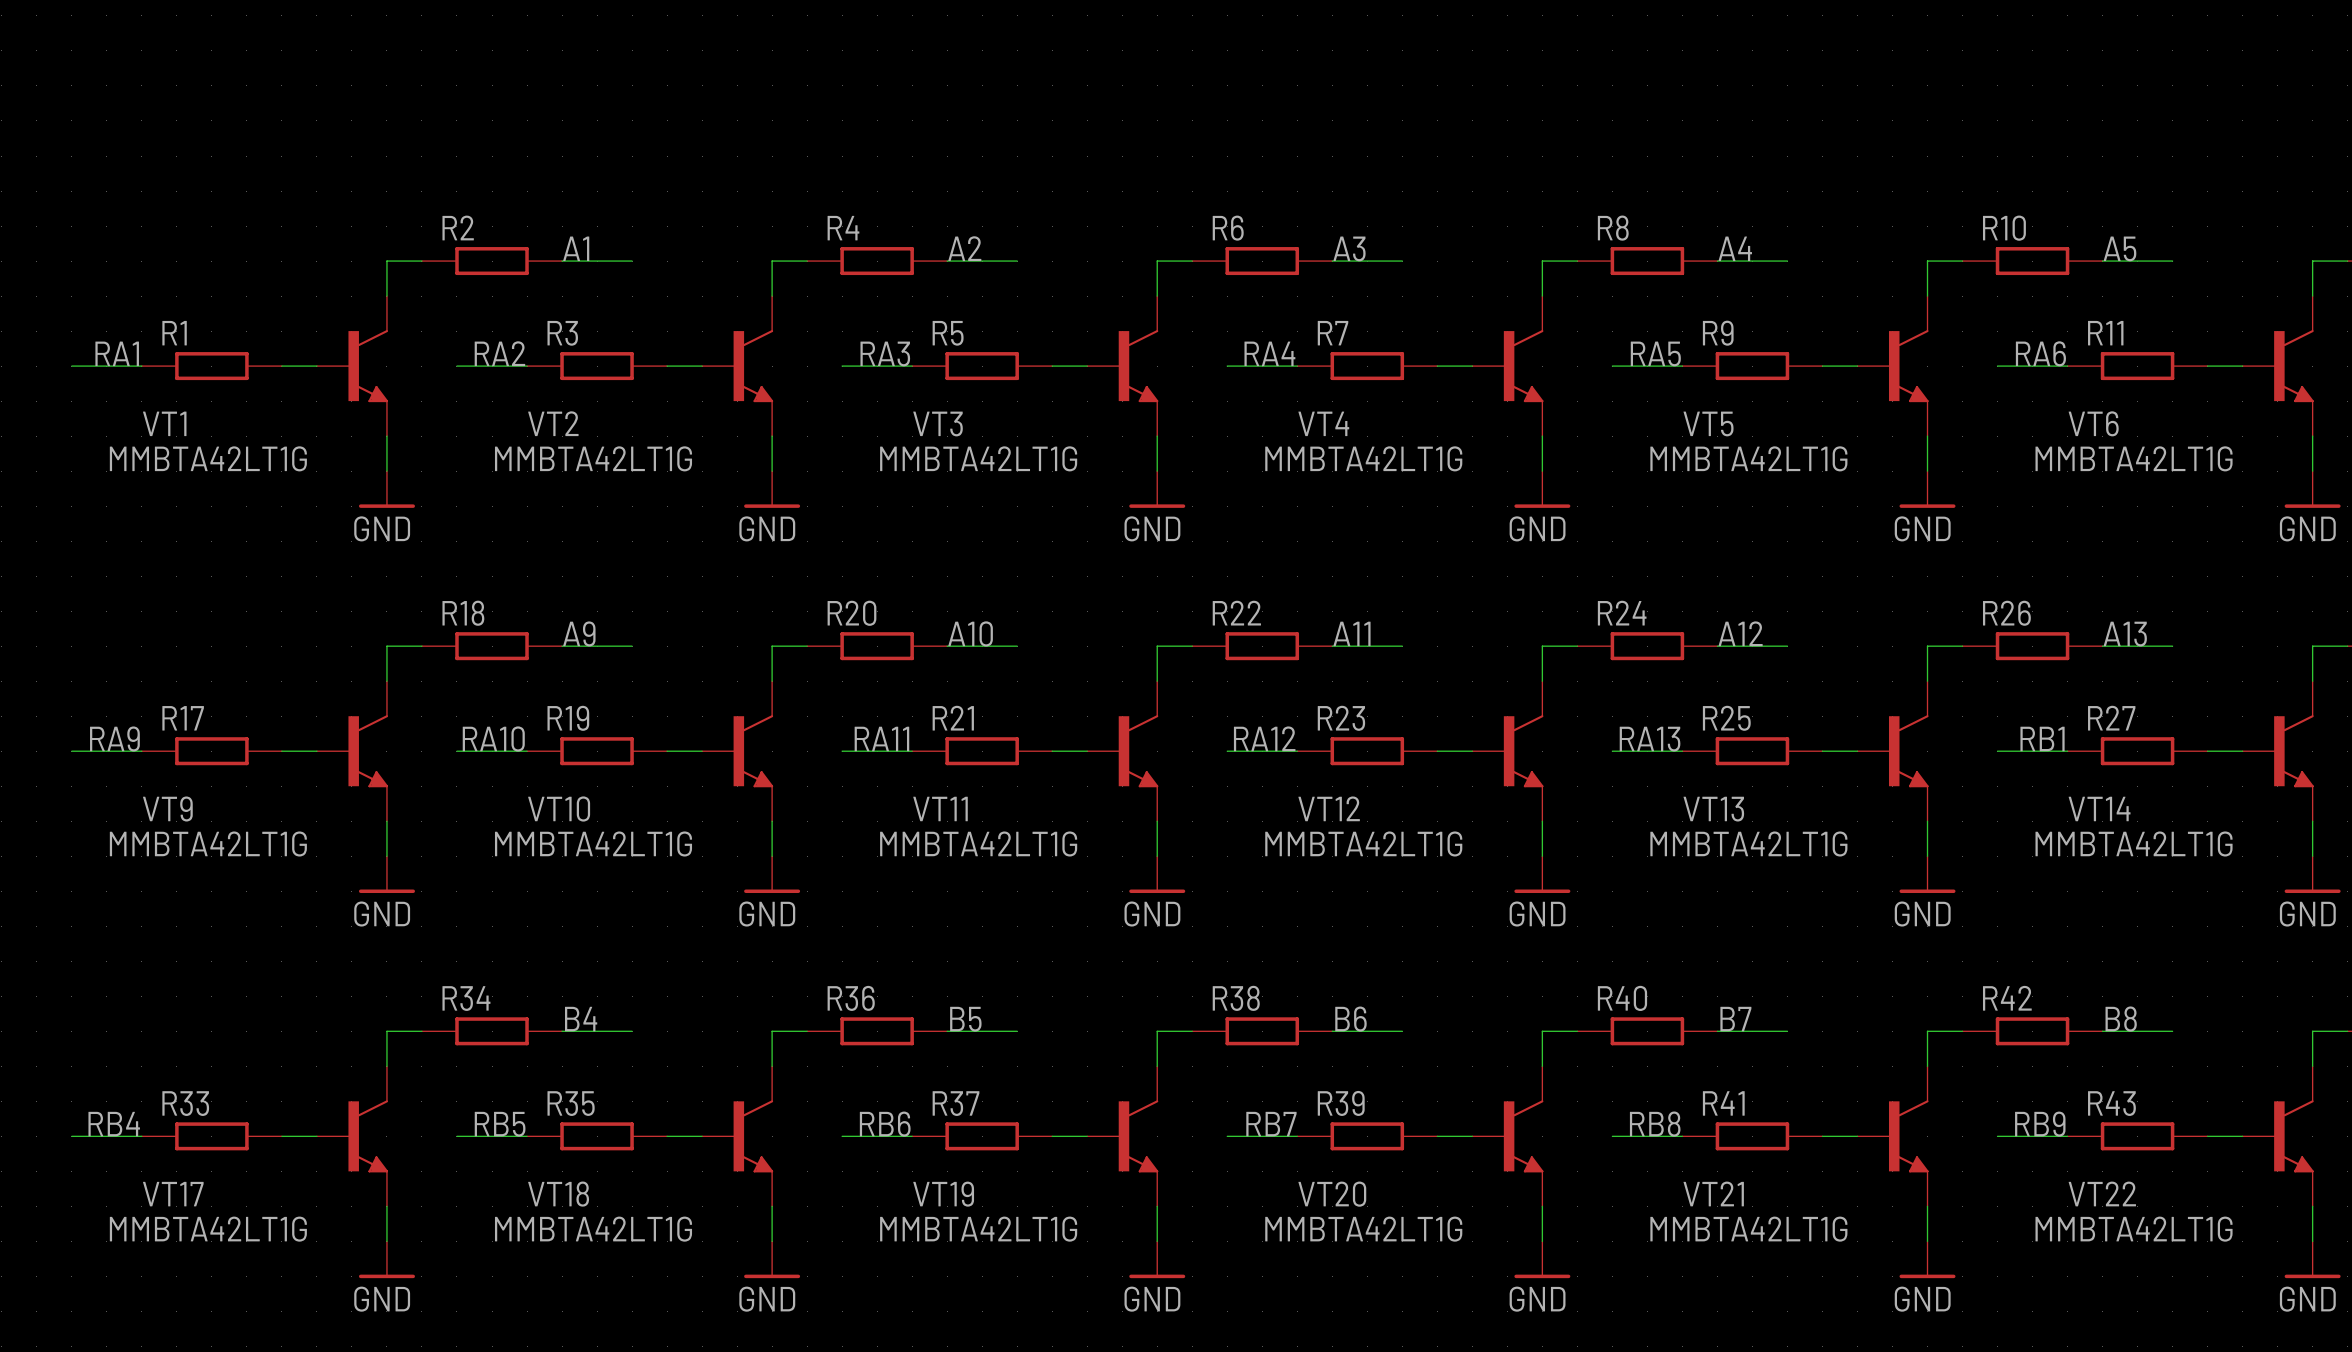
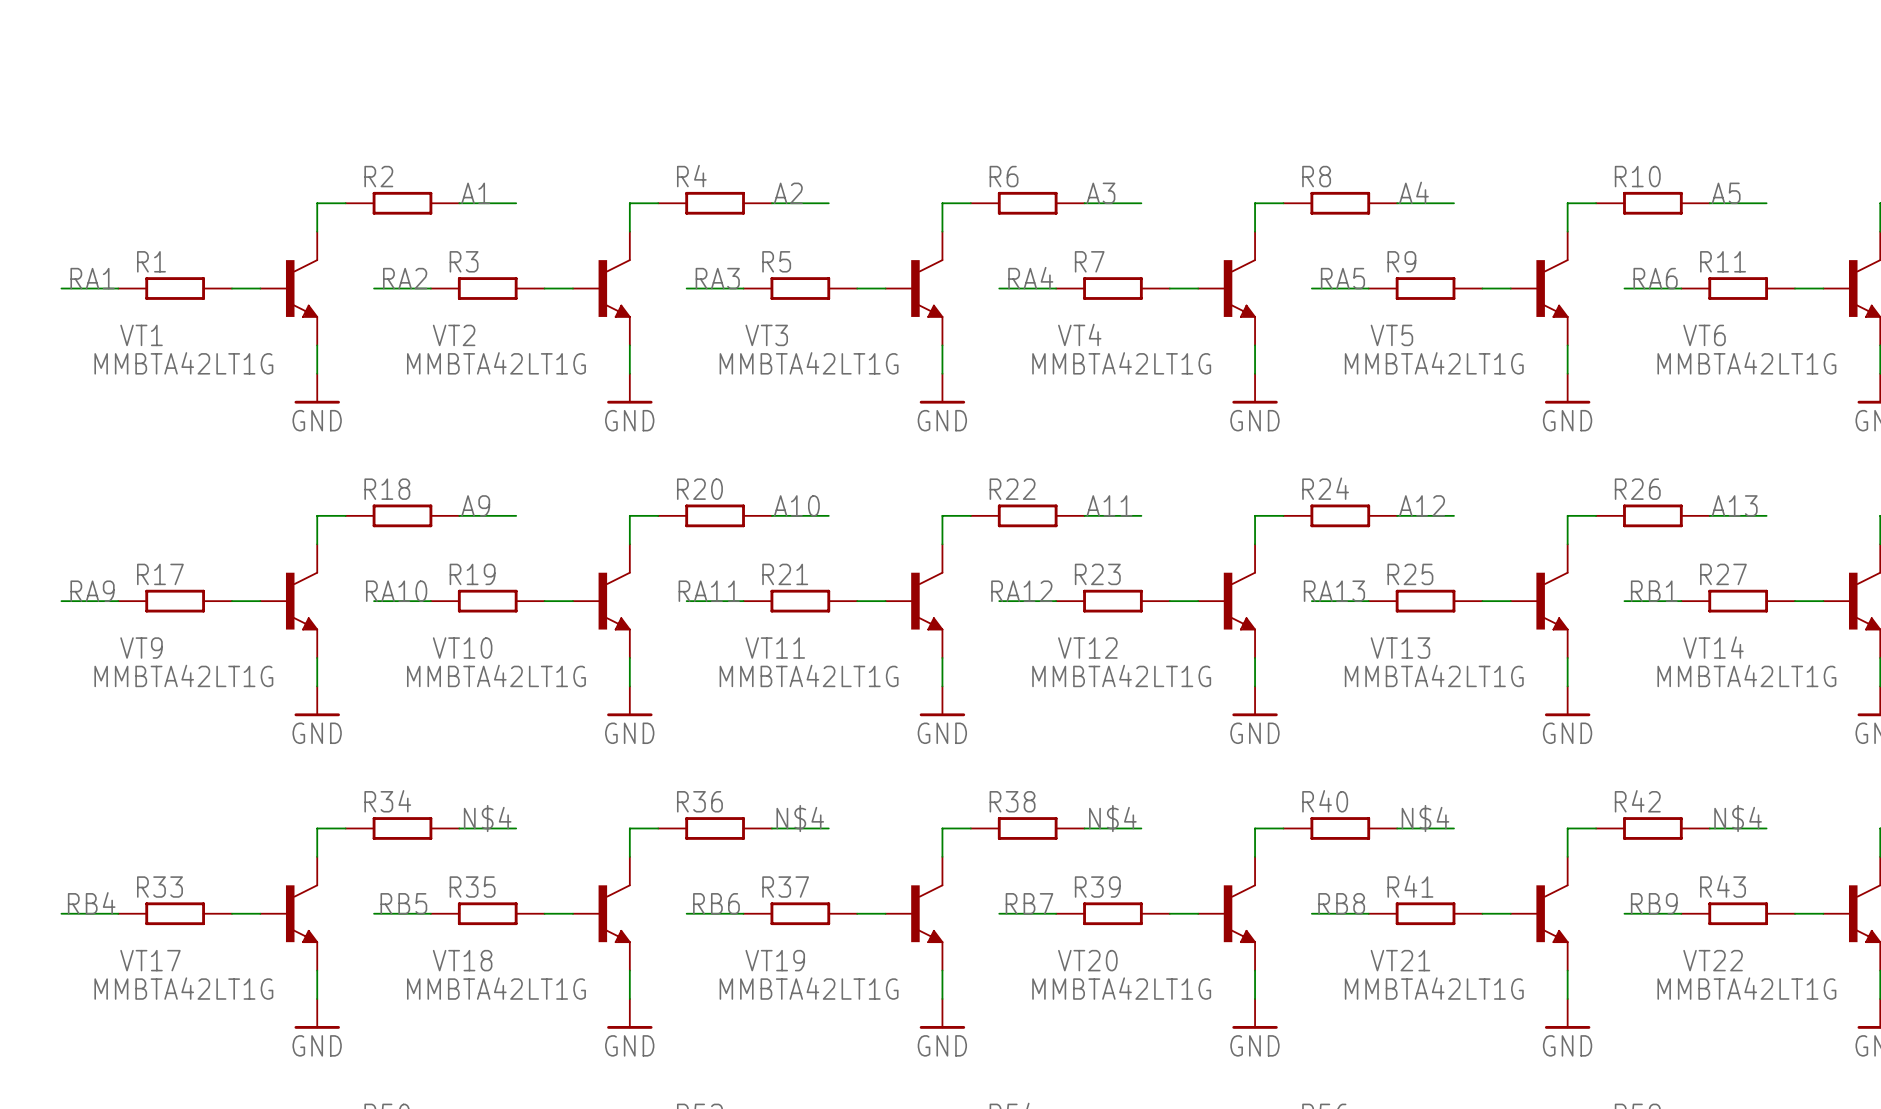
label: B4 (581, 1019) -> N$4 (487, 818)
label: B5 (965, 1019) -> N$4 (800, 818)
label: B6 (1350, 1019) -> N$4 (1112, 818)
label: B7 (1735, 1019) -> N$4 (1425, 818)
label: B8 (2121, 1019) -> N$4 (1738, 818)

